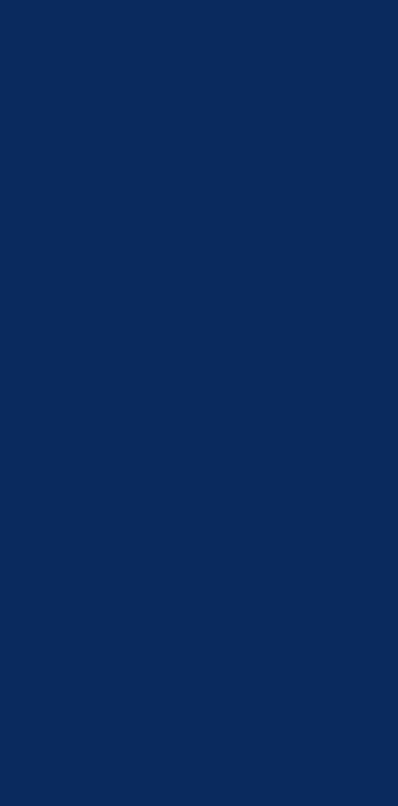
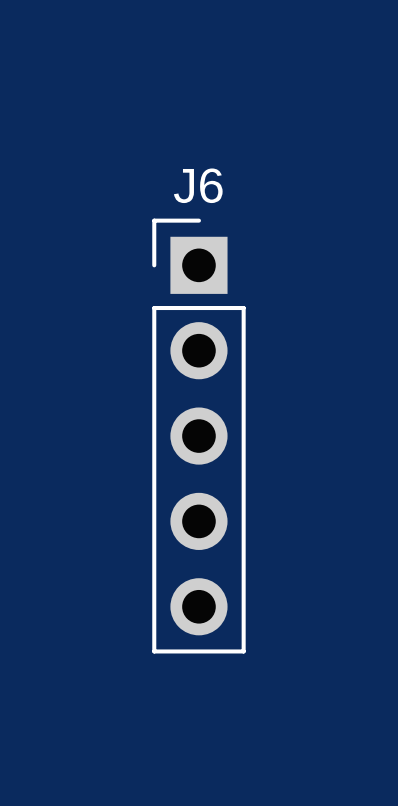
J6: none -> (198, 436)

